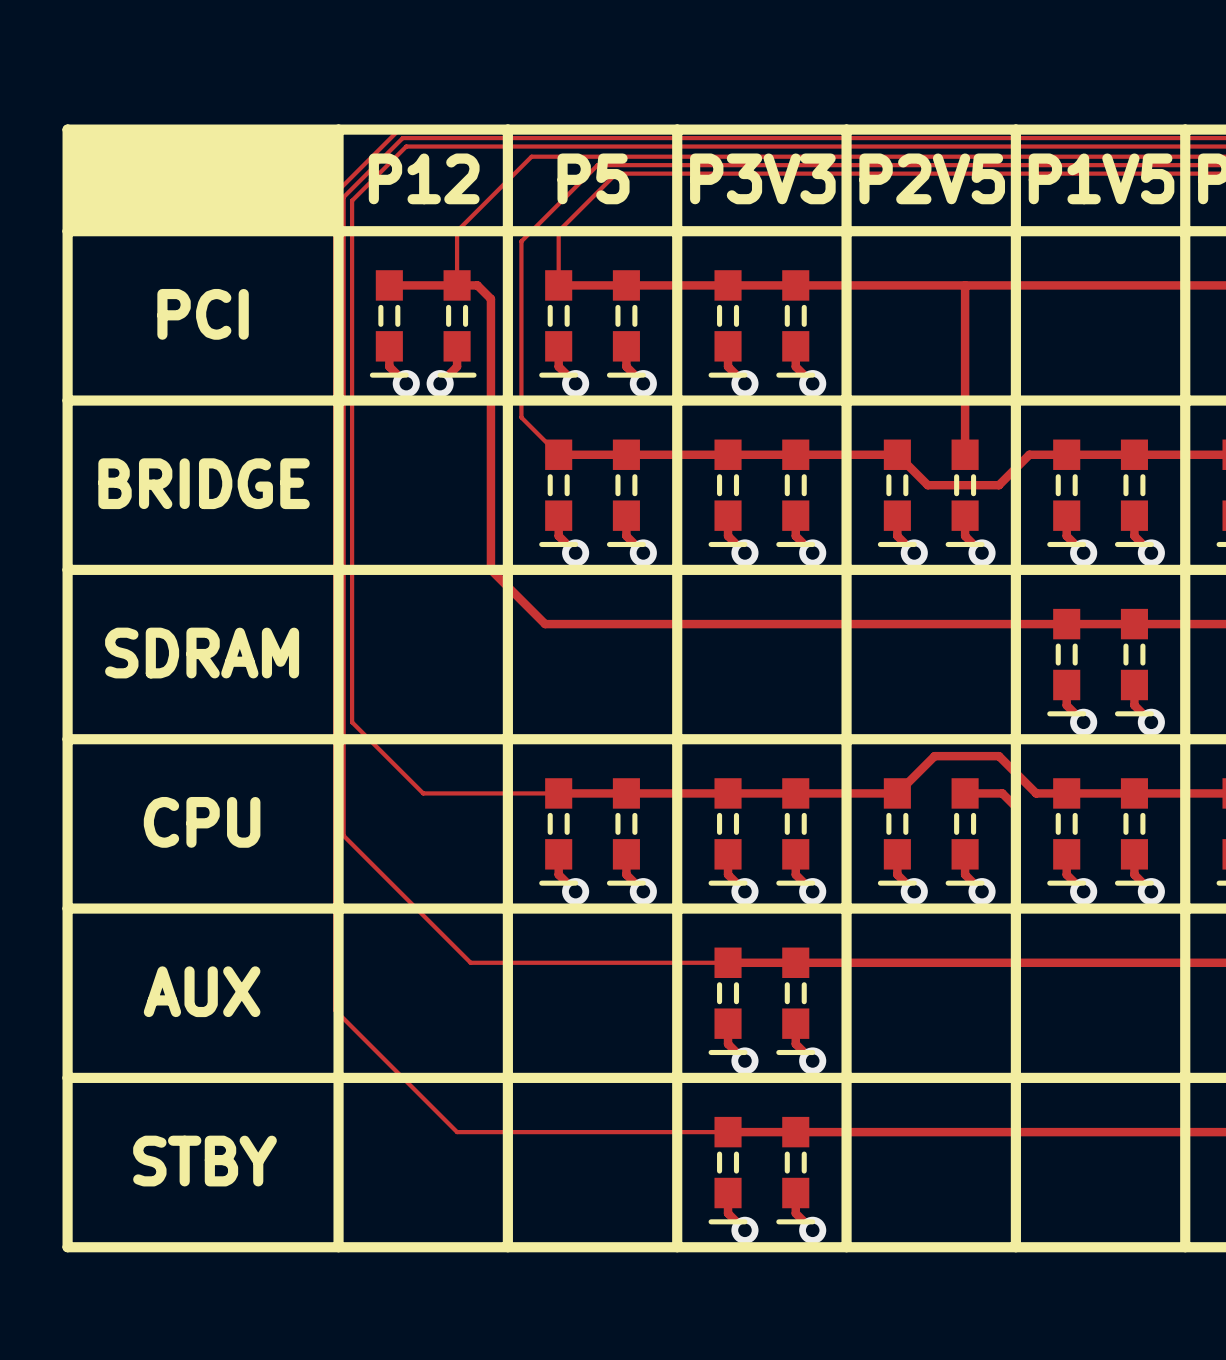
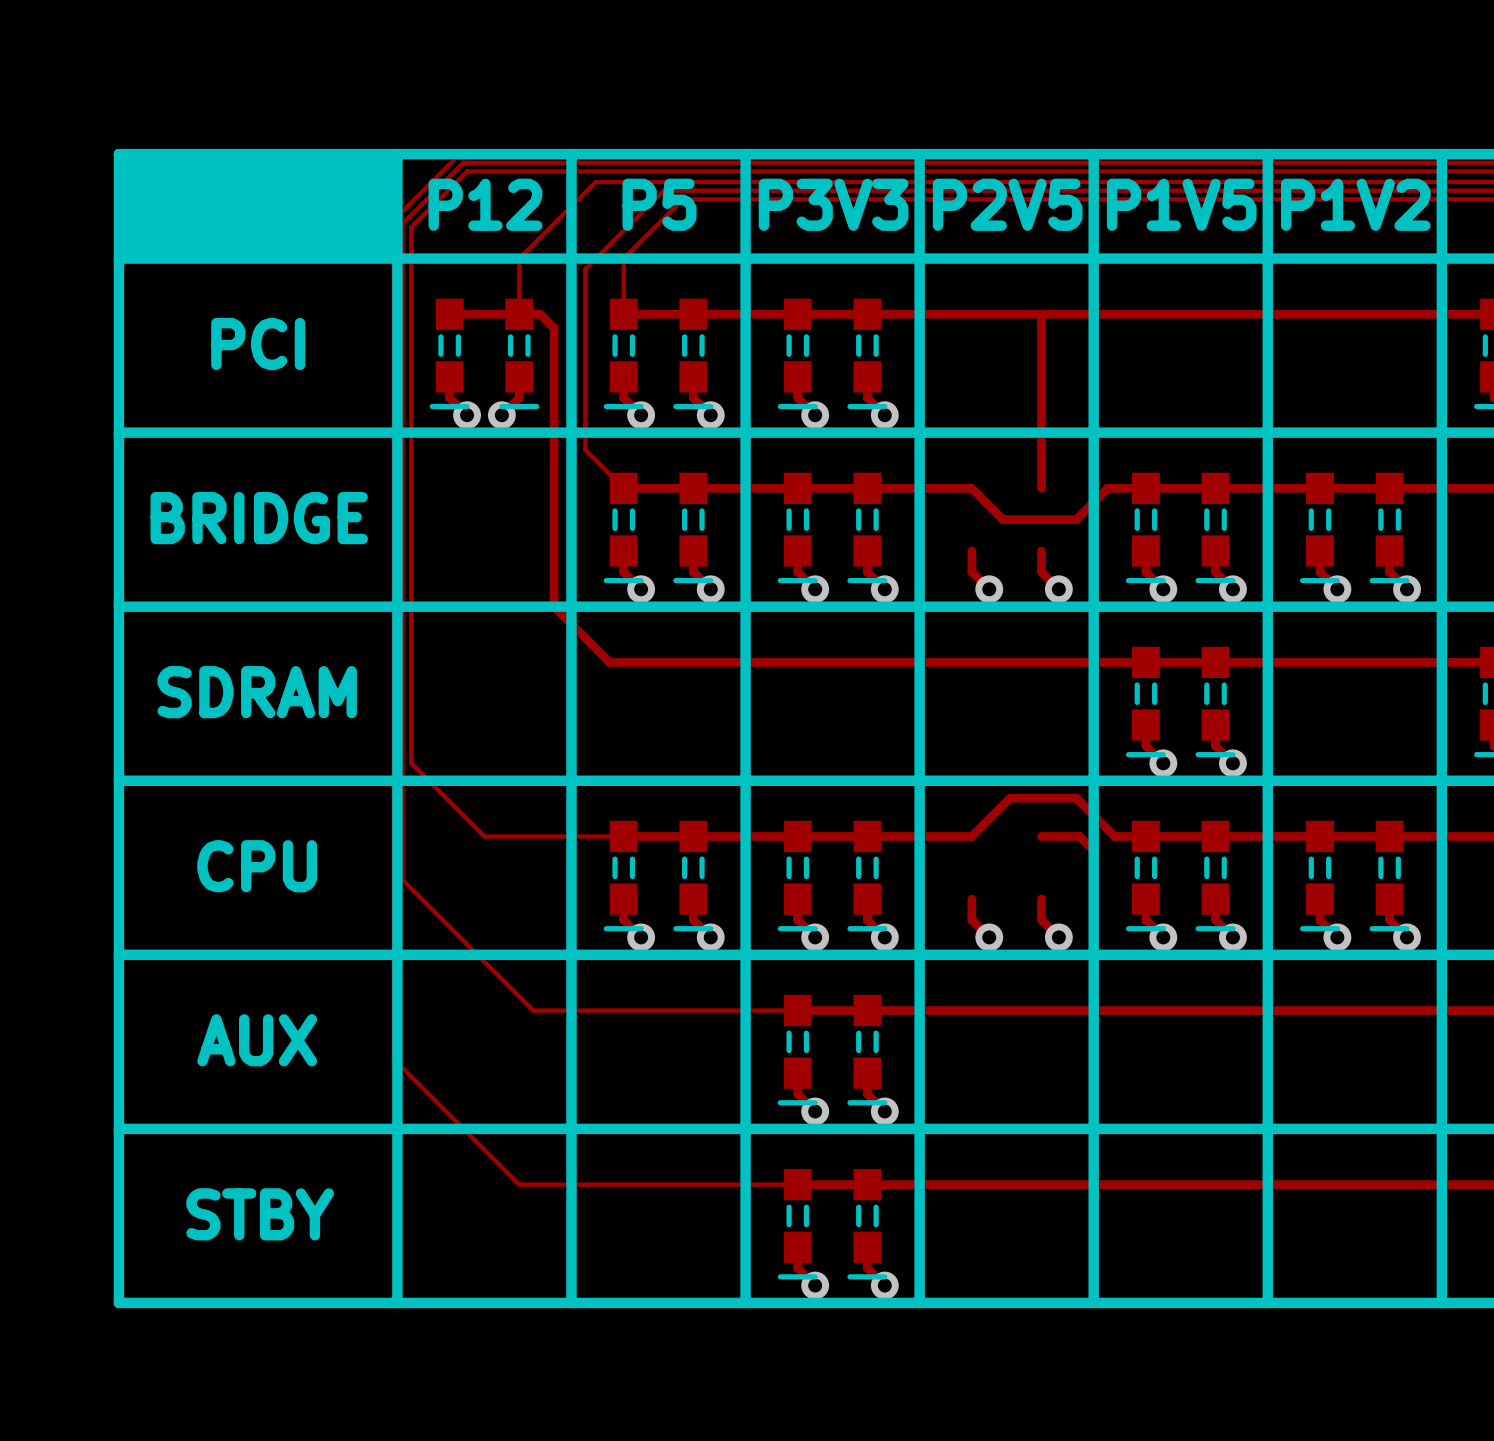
part: (897, 493) -> none
part: (965, 493) -> none
part: (897, 831) -> none
part: (965, 831) -> none

